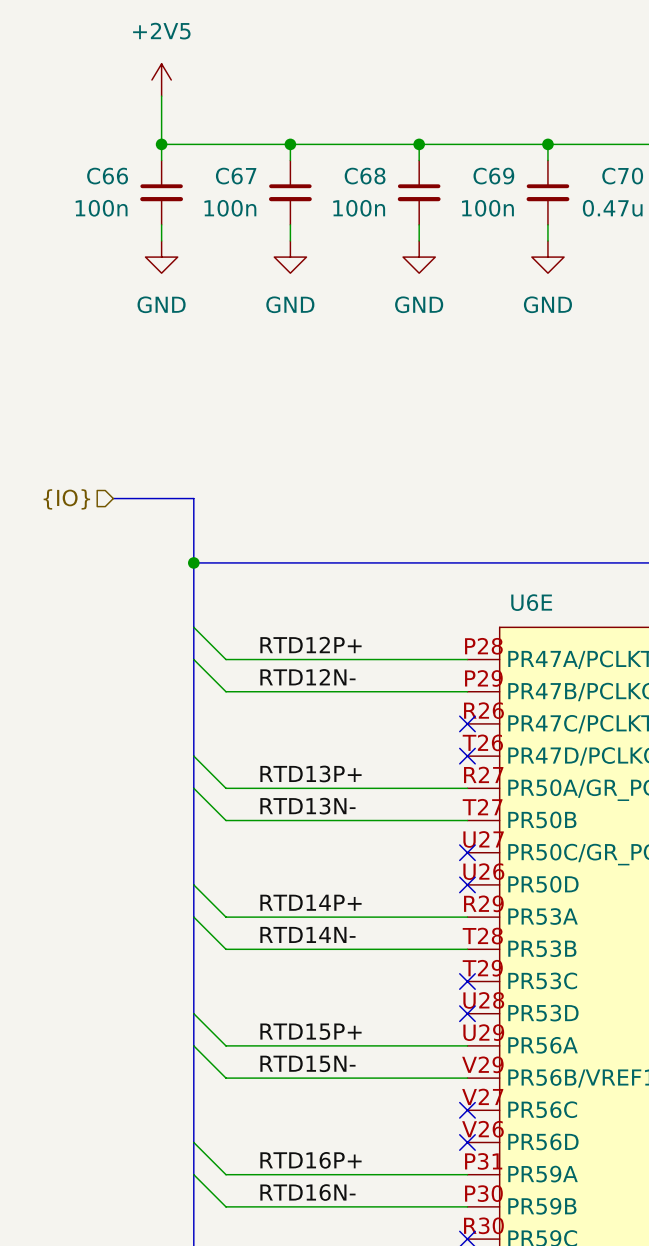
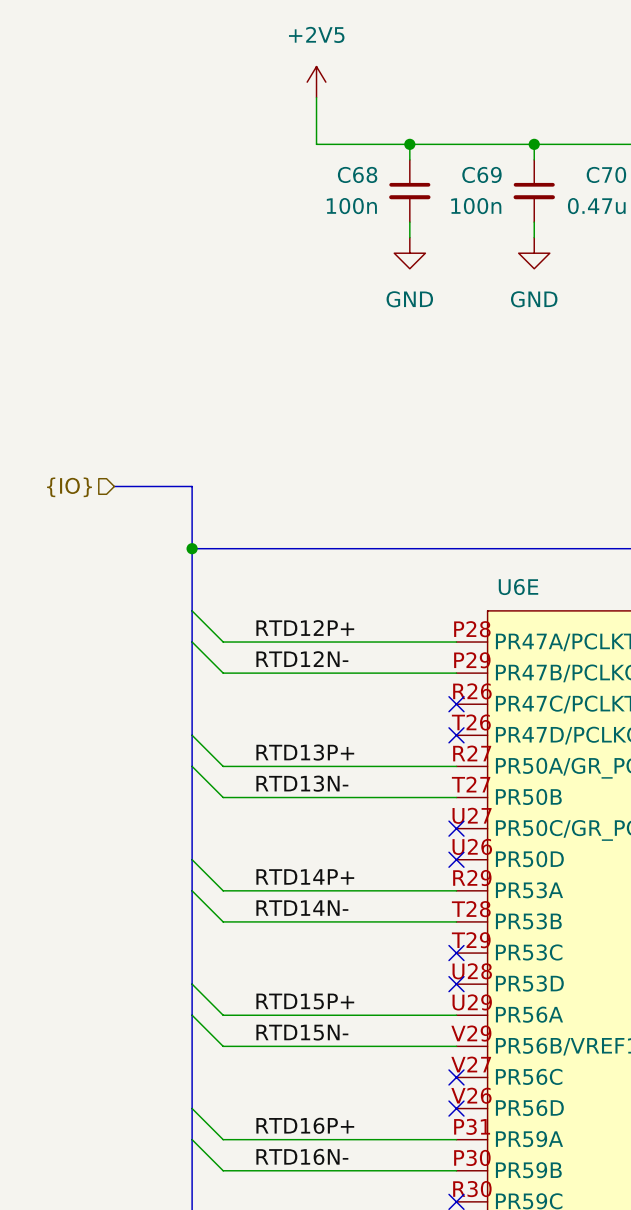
power symbol position: +2V5 (161, 79) -> +2V5 (316, 82)
wire: (161, 96) (161, 160) -> none
wire: (161, 144) (322, 144) -> (316, 97) (316, 144)
junction: (161, 144) -> none
wire: (290, 144) (290, 160) -> none
junction: (290, 144) -> none
C66: 100n (161, 192) -> none
C67: 100n (290, 192) -> none
wire: (161, 224) (161, 240) -> none
wire: (290, 224) (290, 240) -> none
power symbol: GND (161, 257) -> none
power symbol: GND (290, 257) -> none

